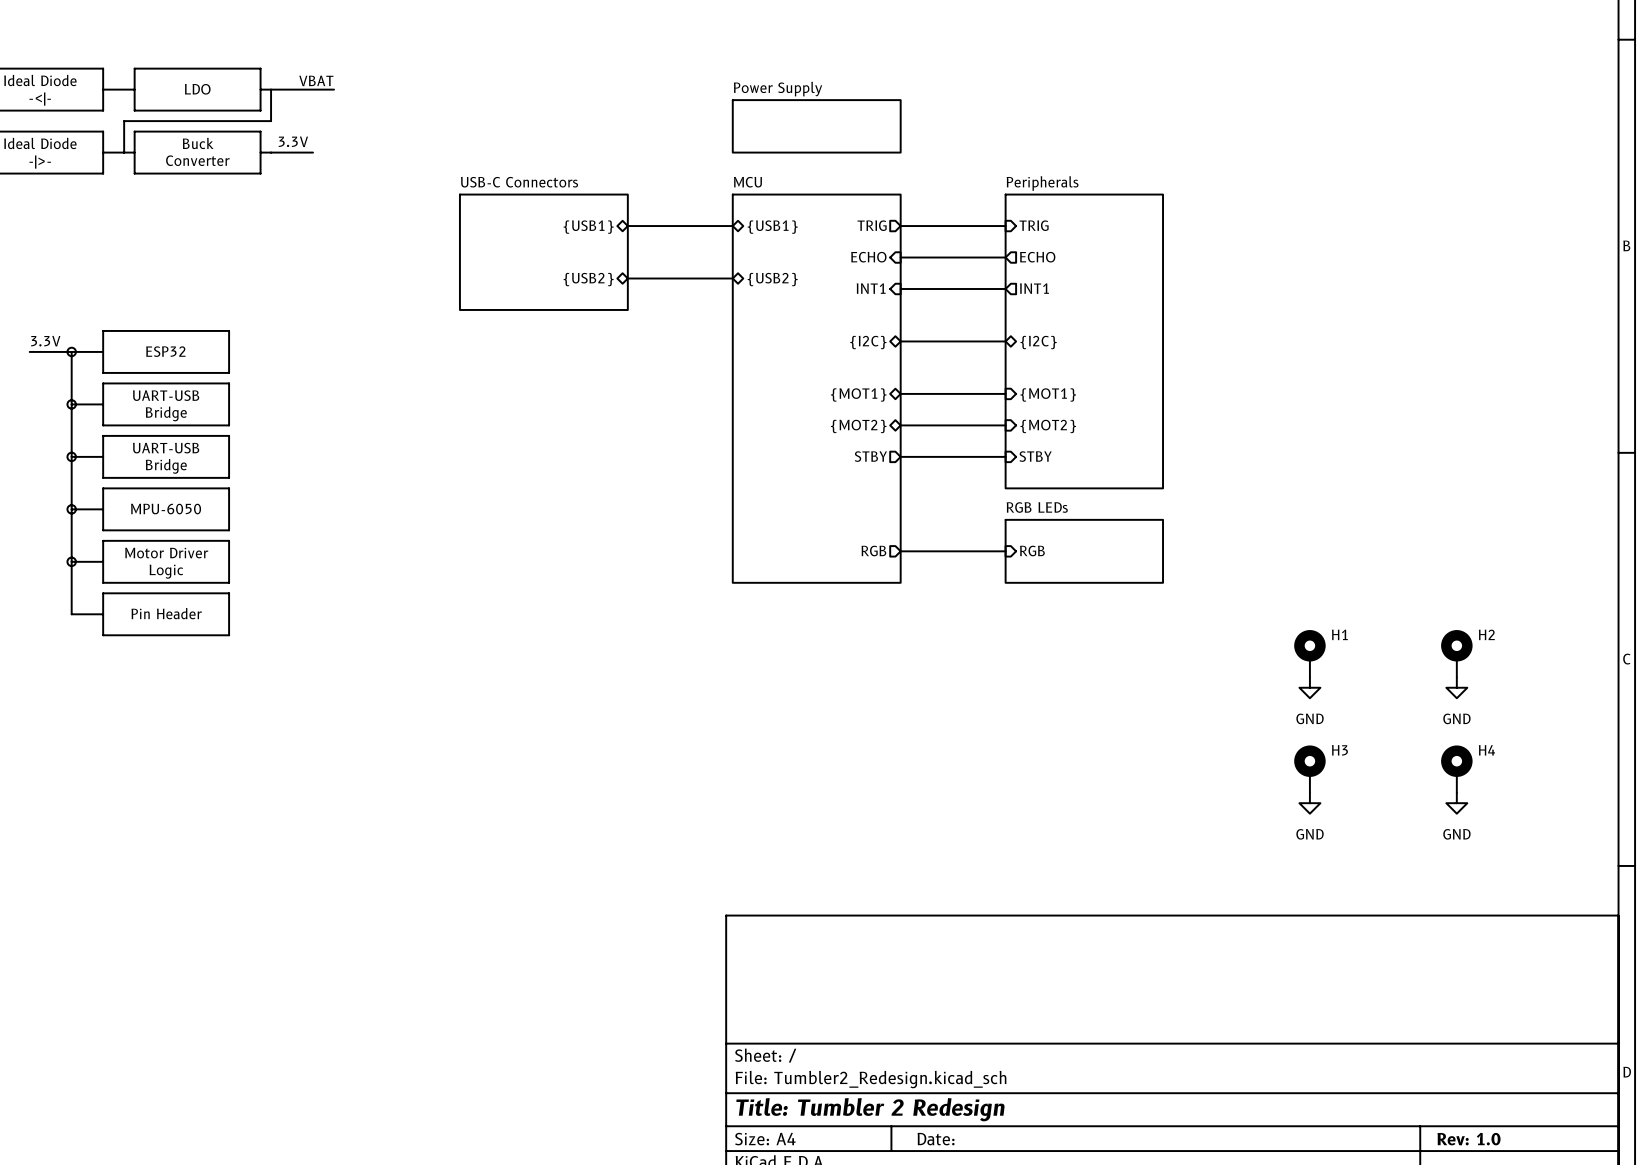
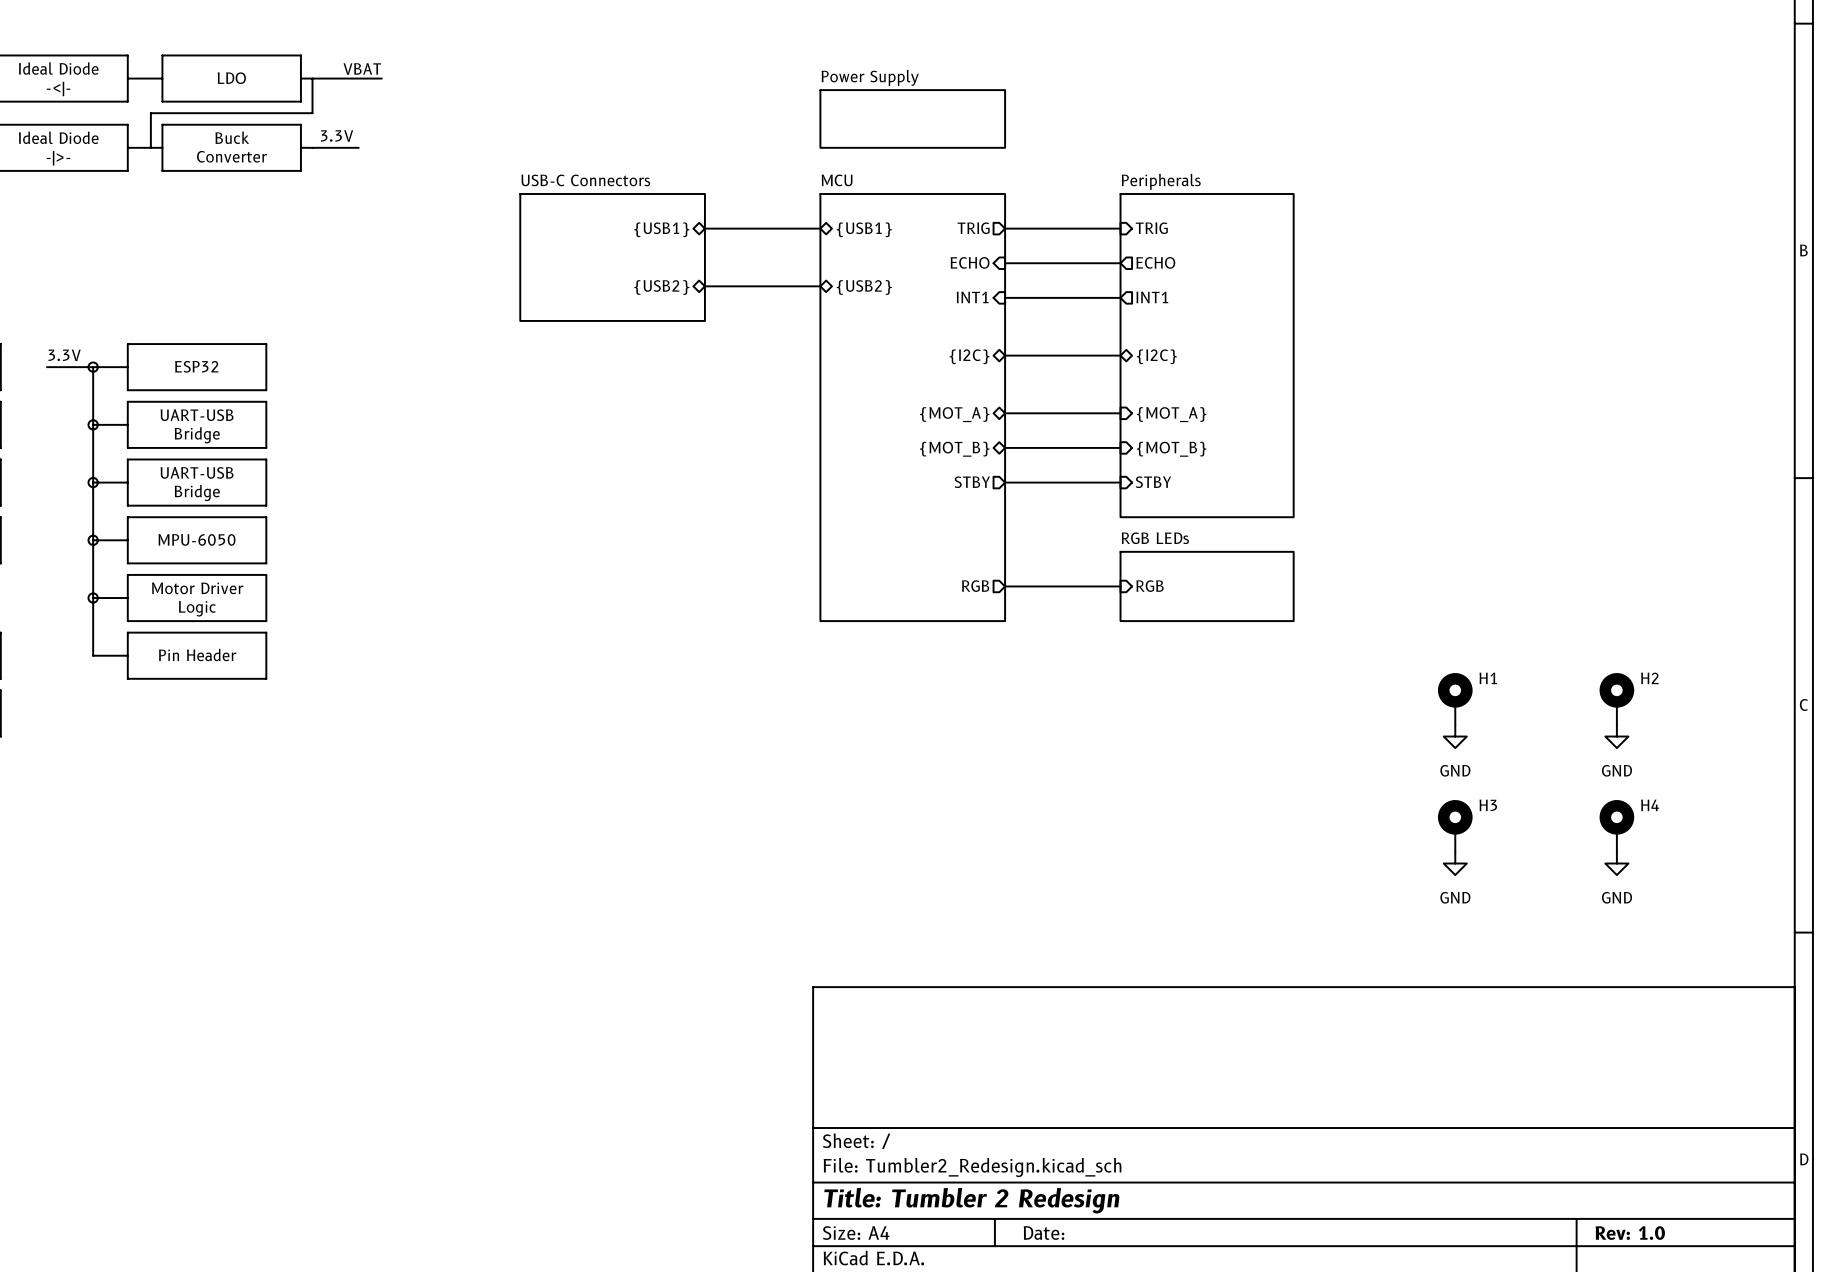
sheet pin: {MOT1} (858, 394) -> {MOT_A} (954, 414)
sheet pin: {MOT1} (1048, 394) -> {MOT_A} (1171, 414)
sheet pin: {MOT2} (858, 426) -> {MOT_B} (954, 449)
sheet pin: {MOT2} (1048, 426) -> {MOT_B} (1171, 449)

